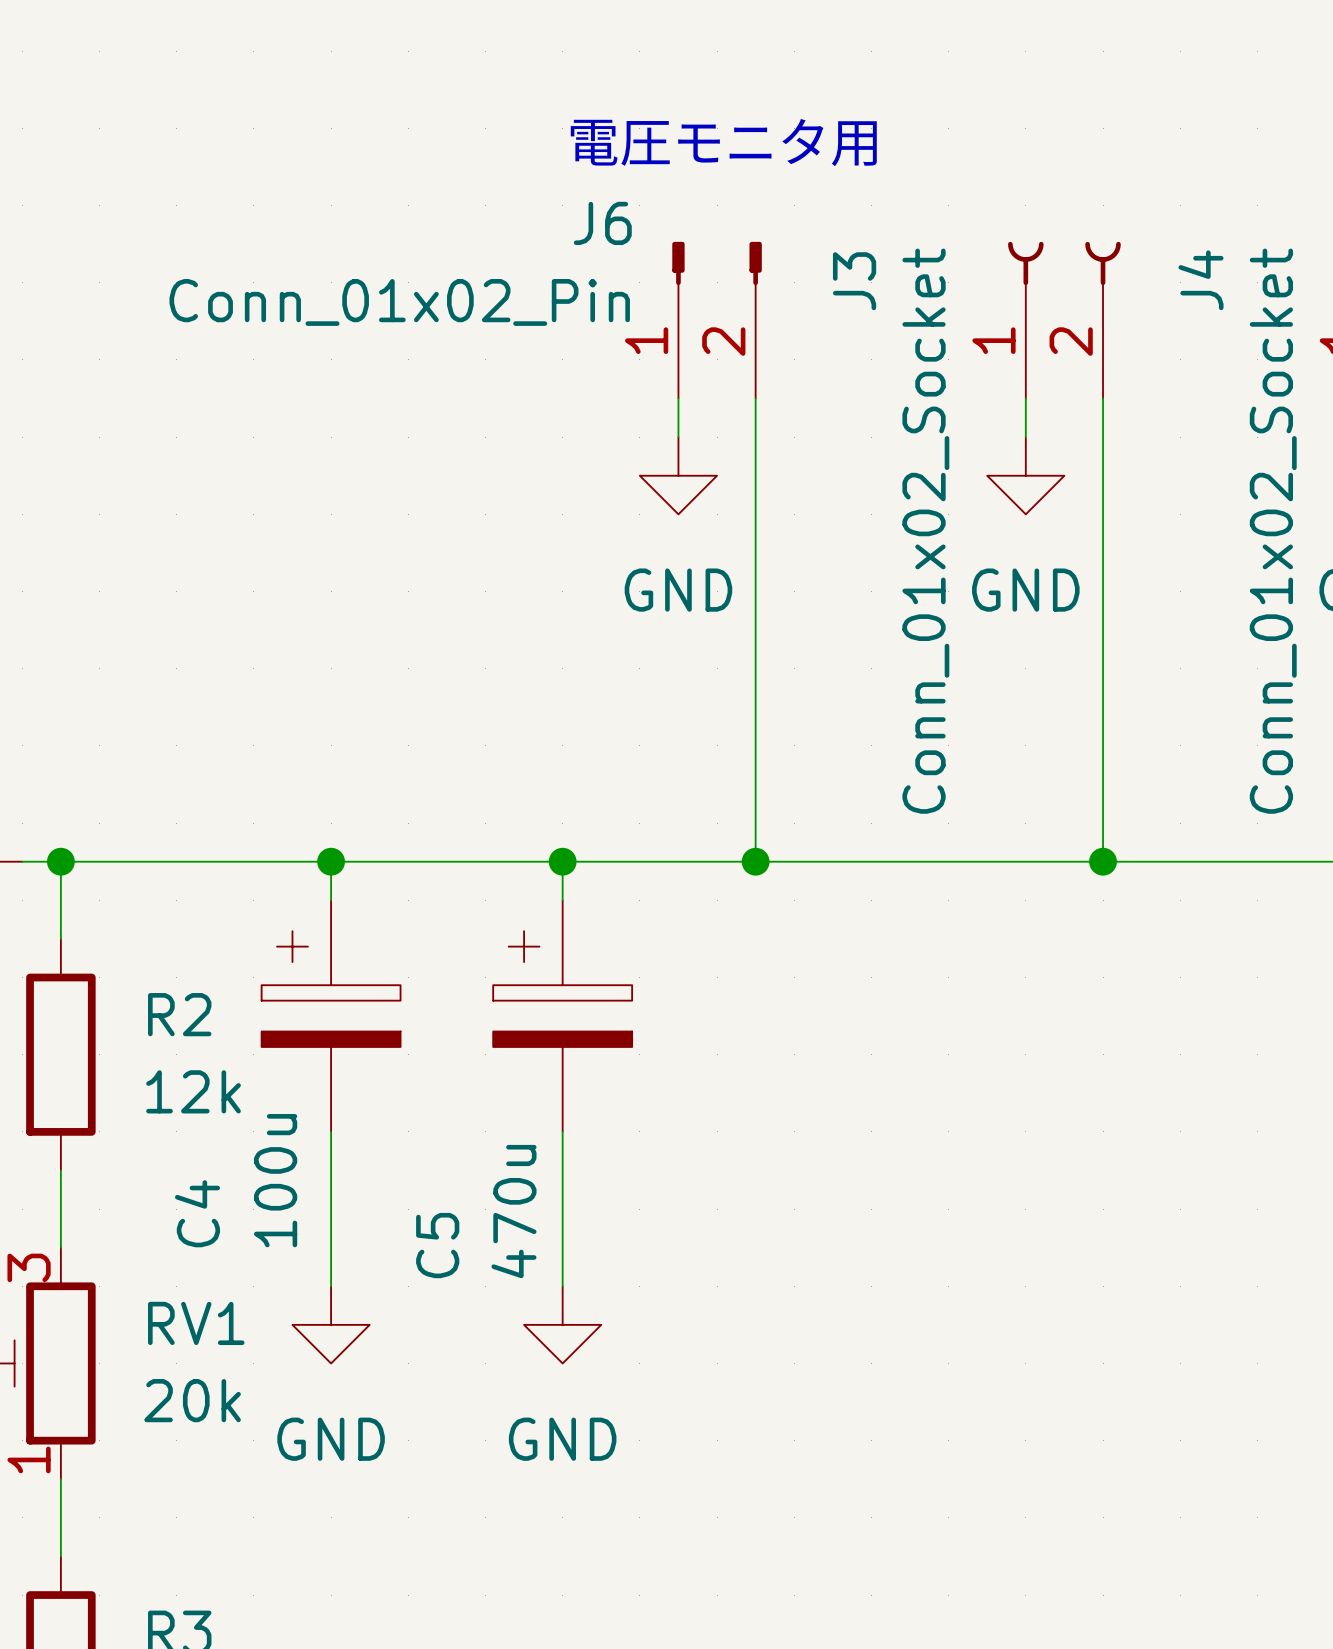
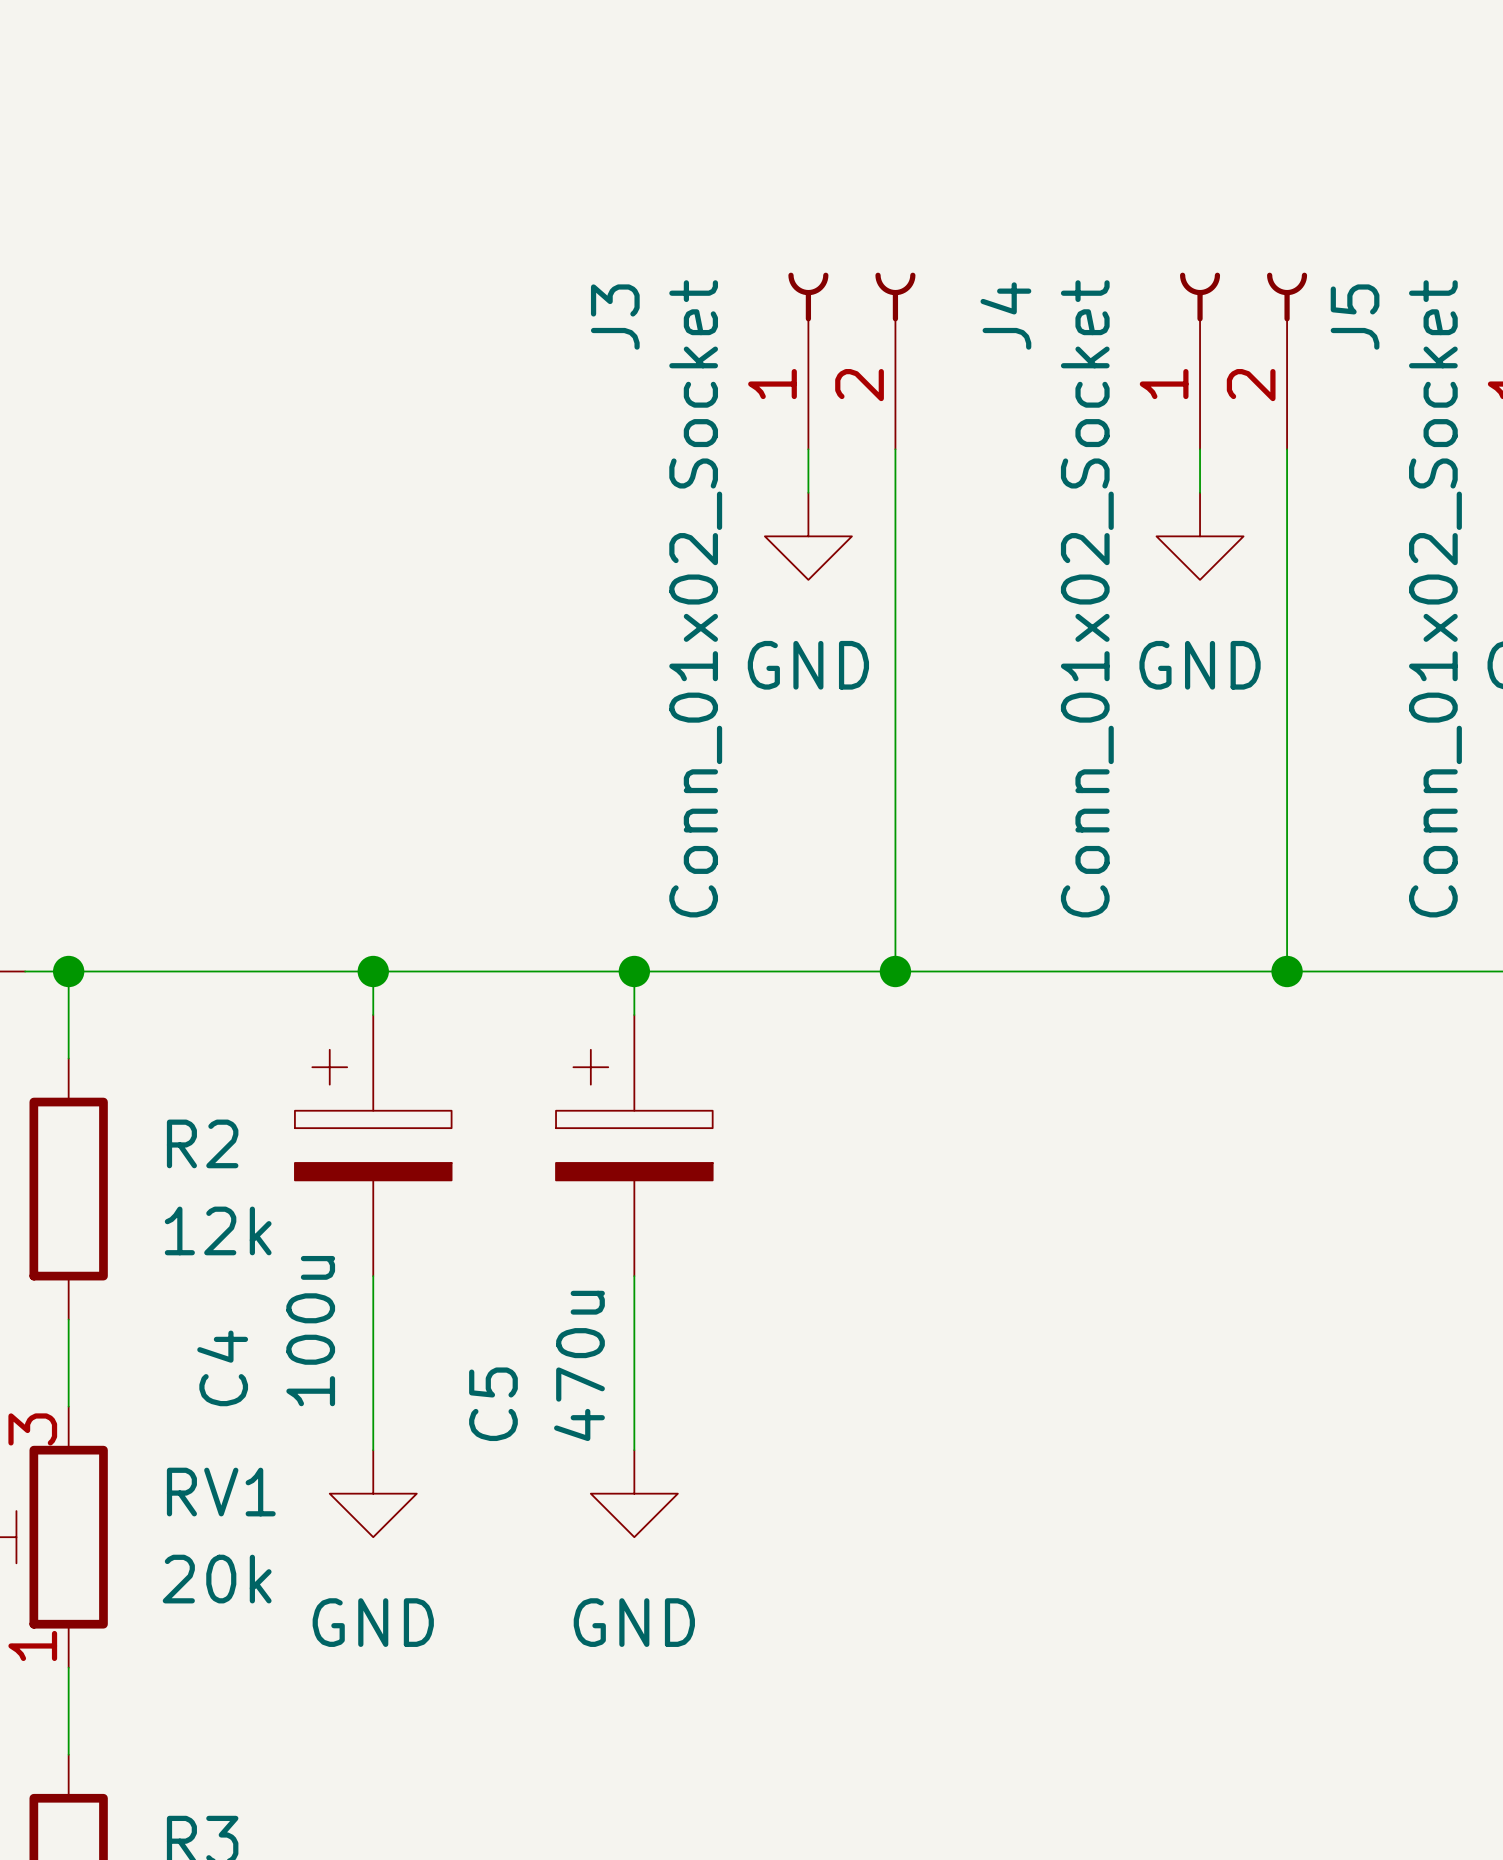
text: 電圧モニタ用 (723, 142) -> none
J4 name: J4 (1201, 280) -> J5 (1355, 317)
J6: Conn_01x02_Pin (717, 320) -> none
J3 position: (1064, 320) -> (851, 360)
J4: none -> Conn_01x02_Socket (1243, 360)
wire: (678, 398) (678, 437) -> (808, 449) (808, 492)
wire: (755, 398) (755, 861) -> (895, 449) (895, 971)
wire: (1025, 398) (1025, 437) -> (1200, 449) (1200, 492)
wire: (1103, 398) (1103, 861) -> (1287, 449) (1287, 971)
power symbol position: GND (678, 475) -> GND (808, 536)
power symbol position: GND (1025, 475) -> GND (1200, 536)
junction position: (755, 861) -> (895, 971)
junction position: (1103, 861) -> (1287, 971)

